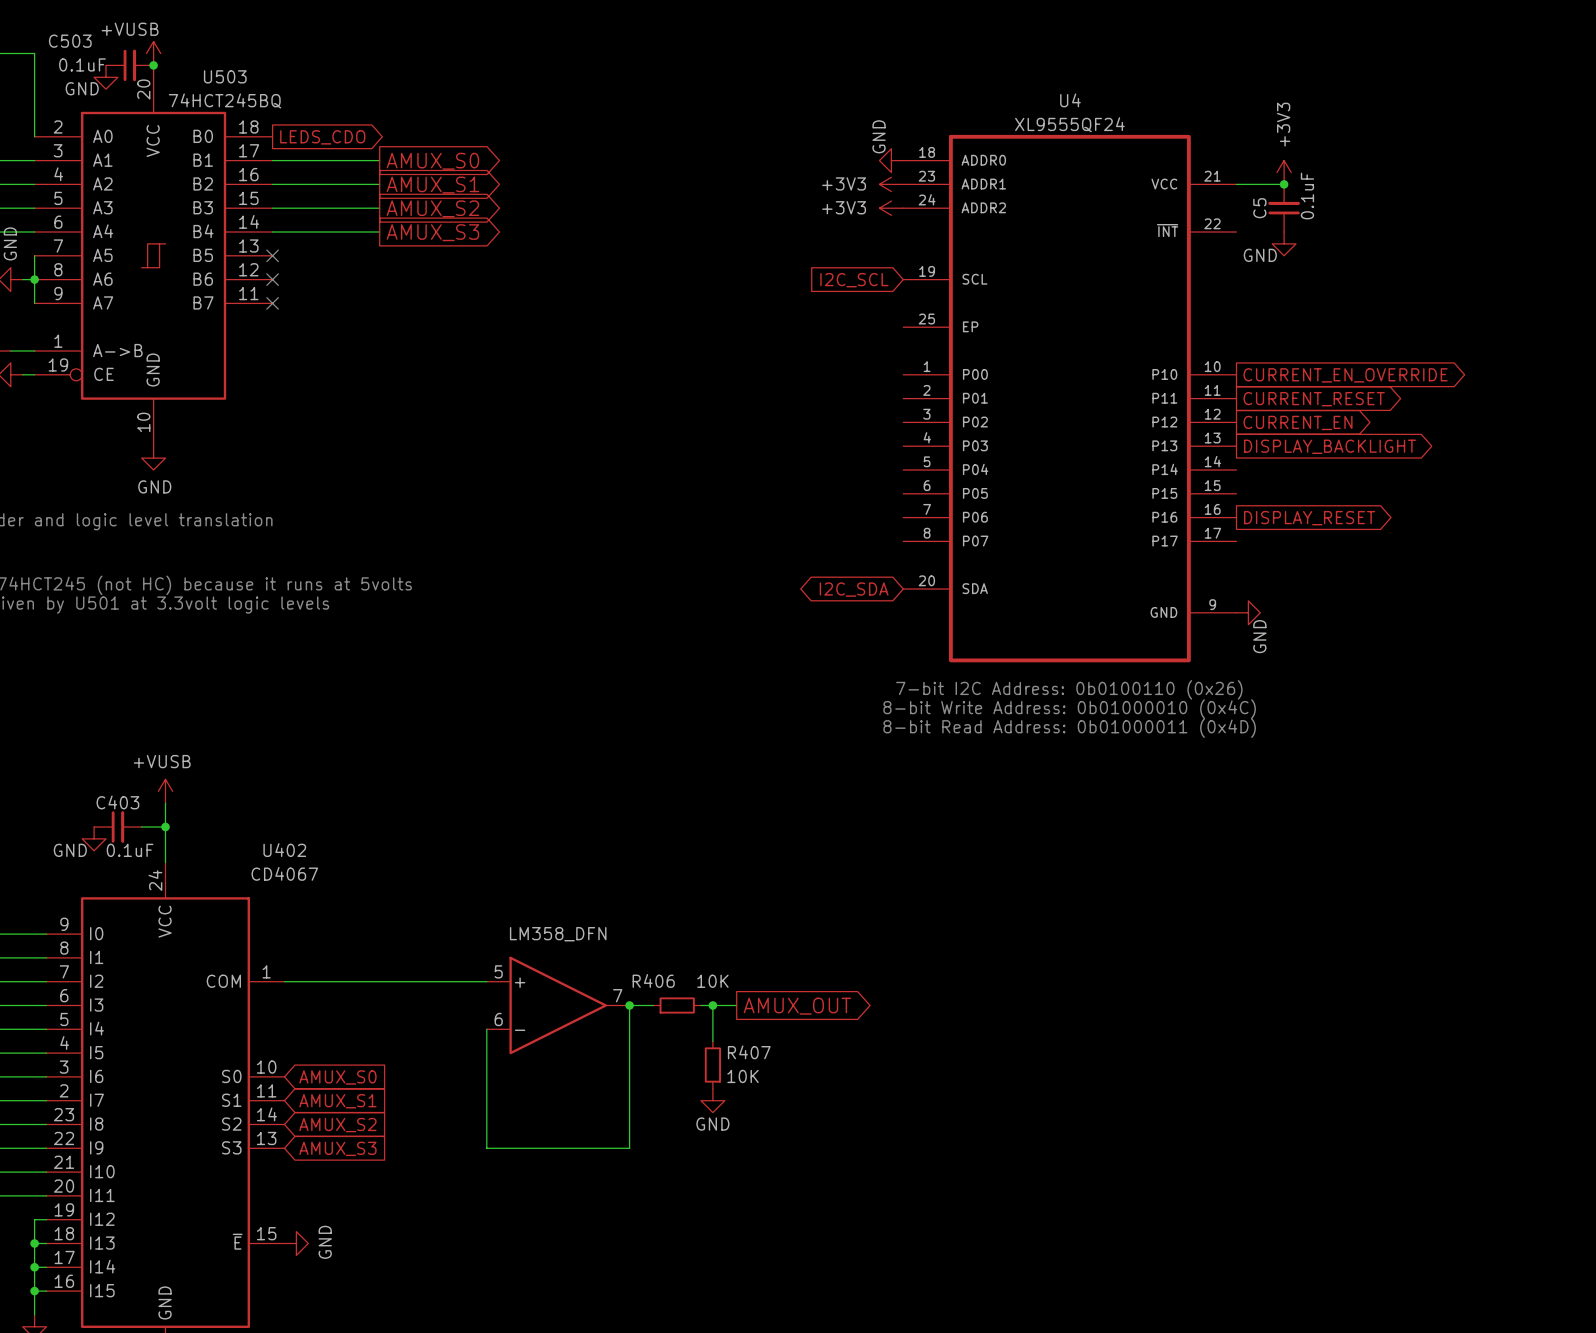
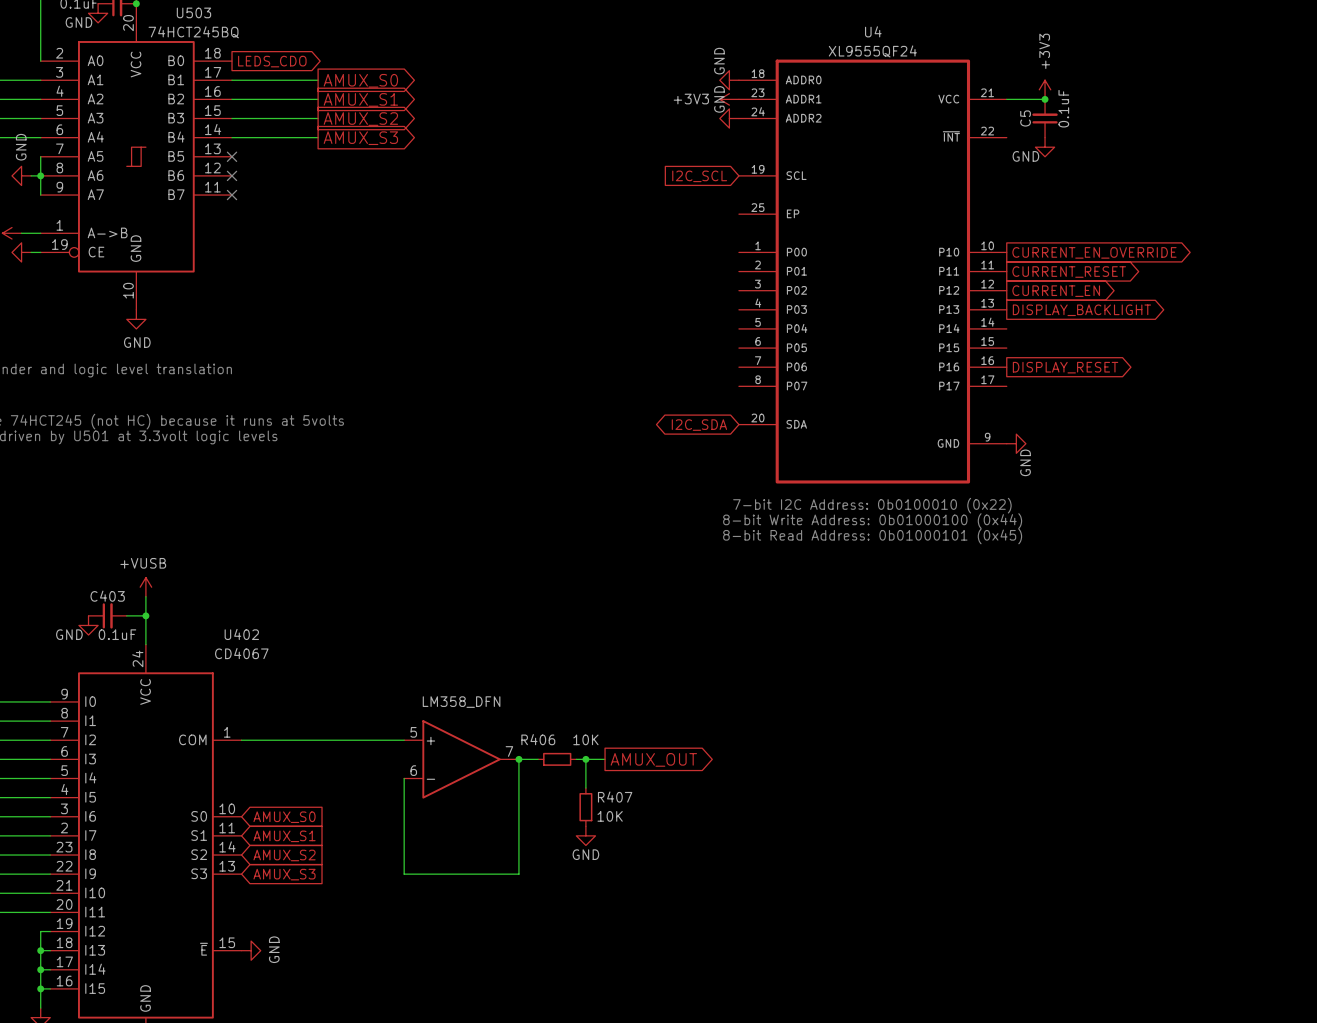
power symbol: +3V3 (891, 208) -> GND (729, 118)
text: 7-bit I2C Address: 0b0100110 (0x26) (1069, 689) -> 7-bit I2C Address: 0b0100010 (0x22) (872, 505)
text: 8-bit Write Address: 0b01000010 (0x4C) (1069, 709) -> 8-bit Write Address: 0b01000100 (0x44) (872, 521)
text: 8-bit Read Address: 0b01000011 (0x4D) (1069, 728) -> 8-bit Read Address: 0b01000101 (0x45) (872, 536)

